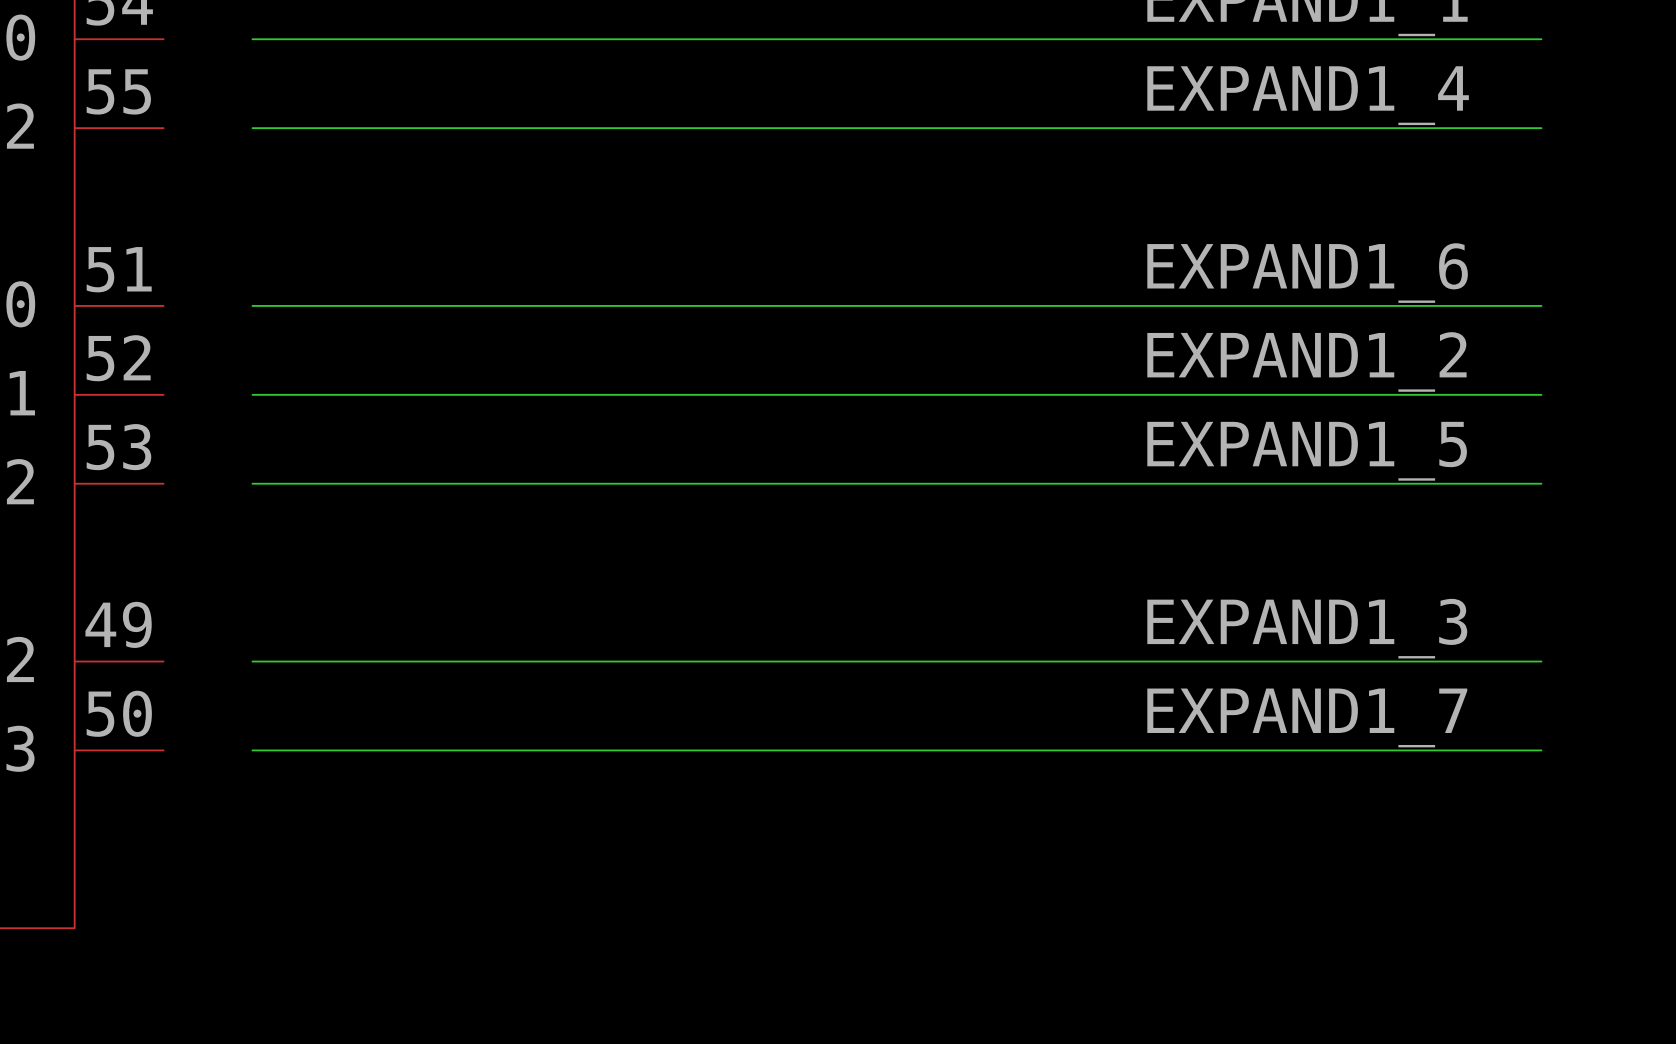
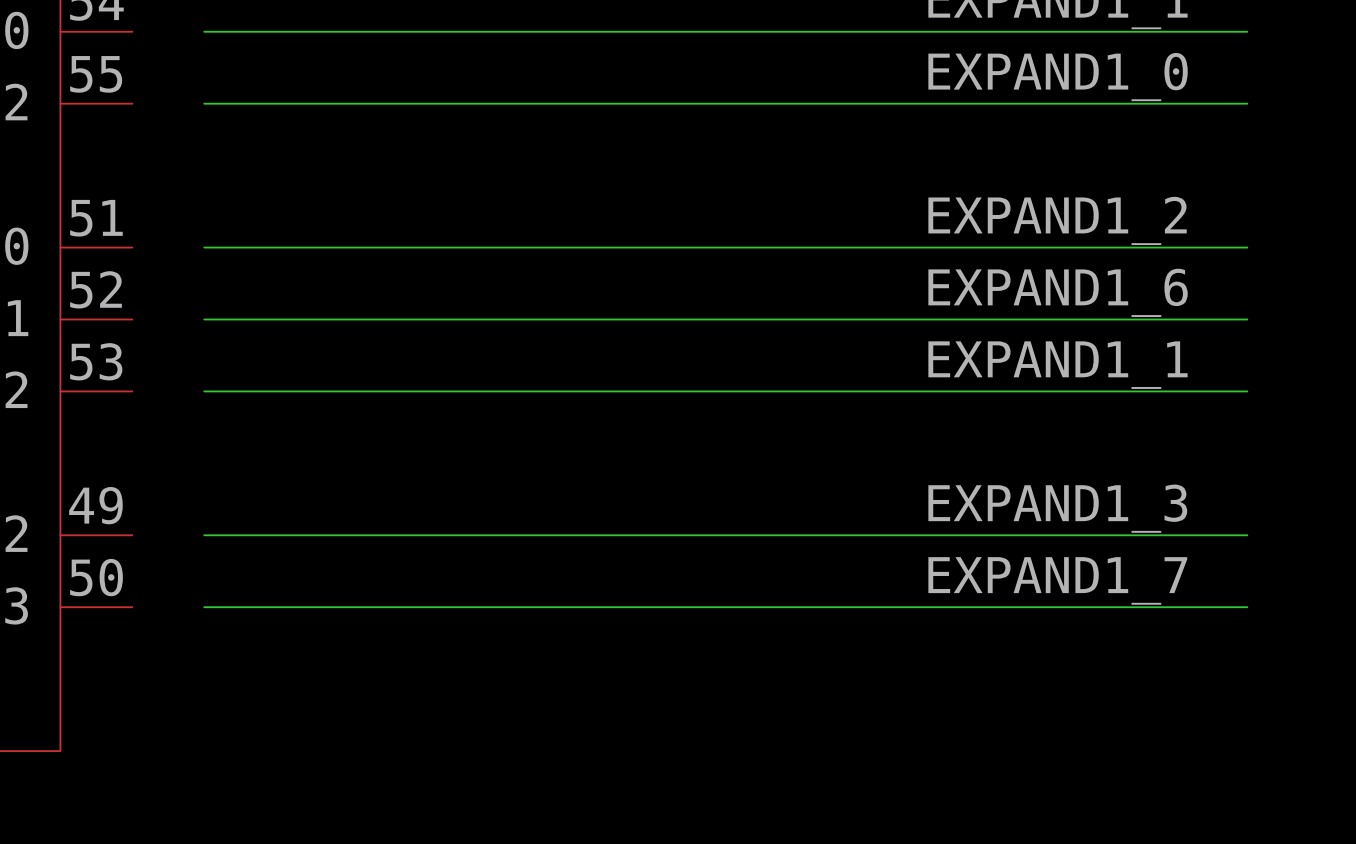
label: EXPAND1_4 (1308, 95) -> EXPAND1_0 (1058, 77)
label: EXPAND1_6 (1307, 273) -> EXPAND1_2 (1057, 220)
label: EXPAND1_2 (1306, 361) -> EXPAND1_6 (1058, 292)
label: EXPAND1_5 (1307, 451) -> EXPAND1_1 (1057, 365)

